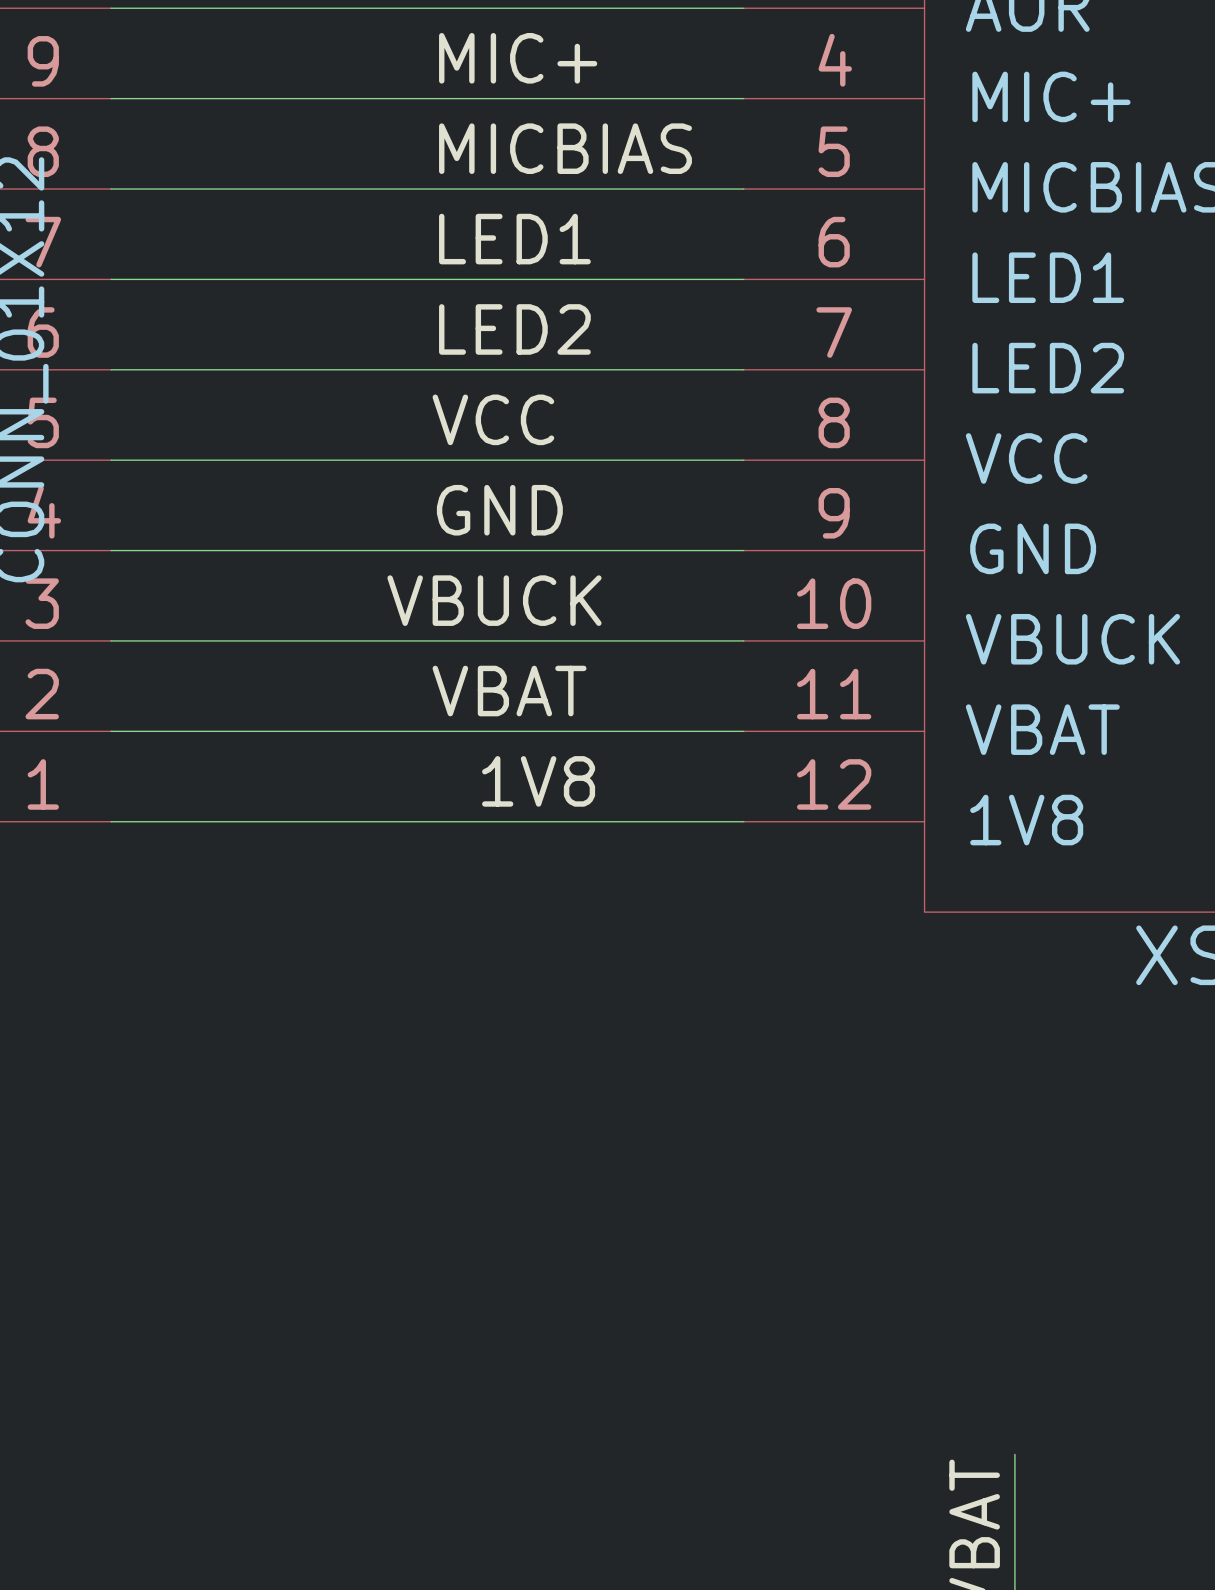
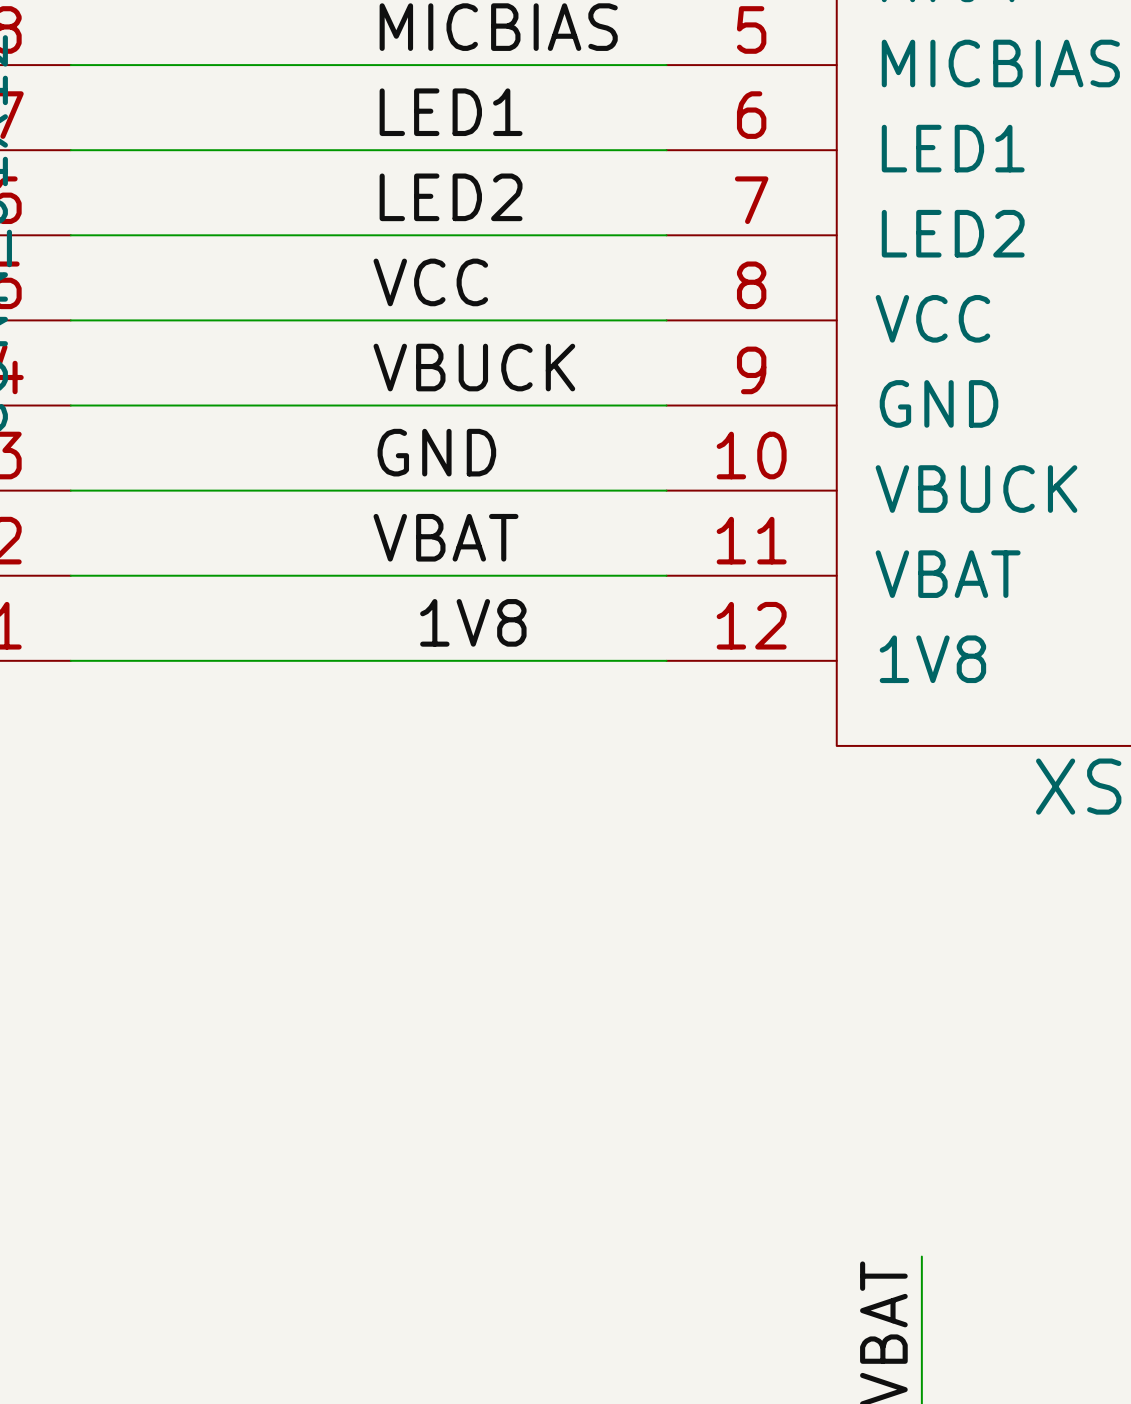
label: GND (499, 510) -> VBUCK (474, 367)
label: VBUCK (494, 600) -> none
label: none -> GND (436, 452)

